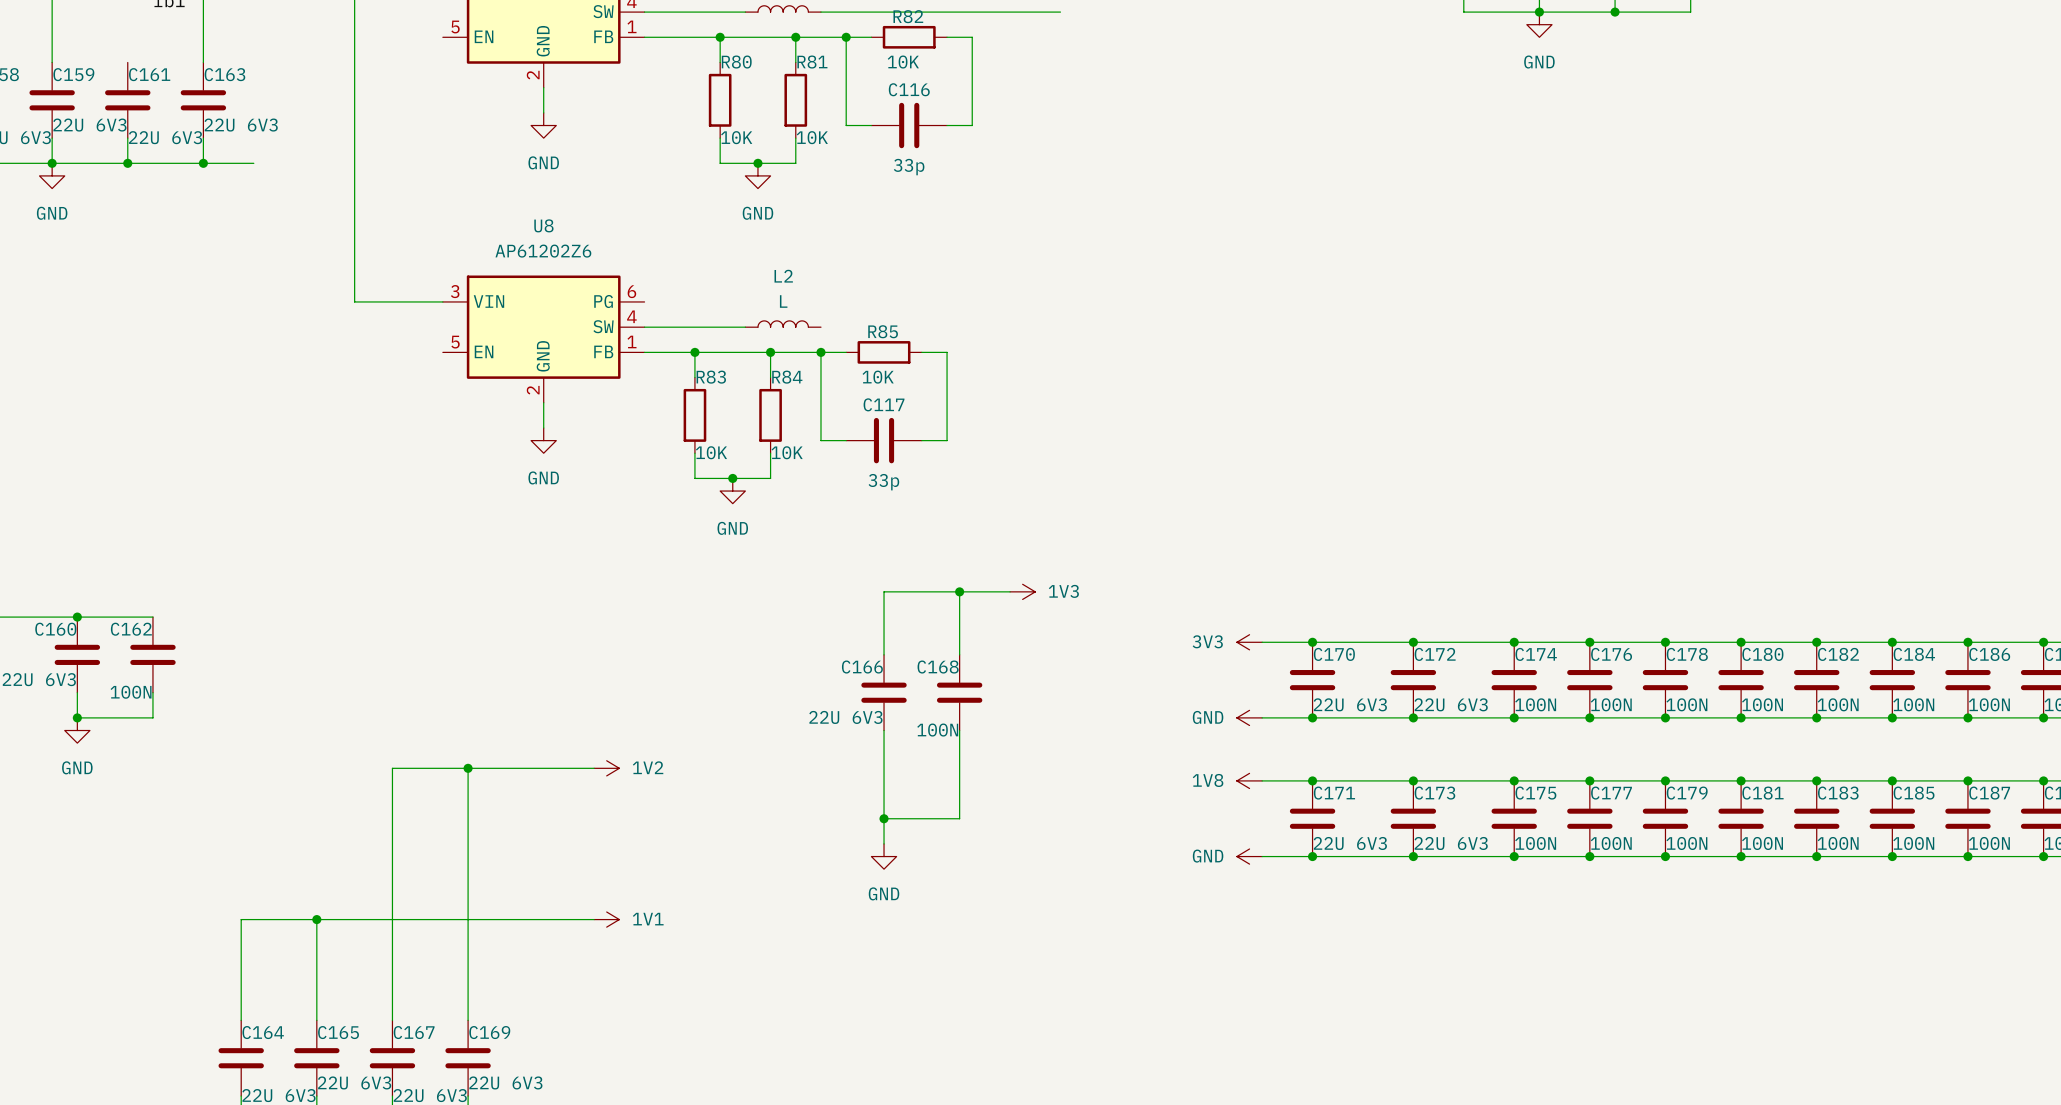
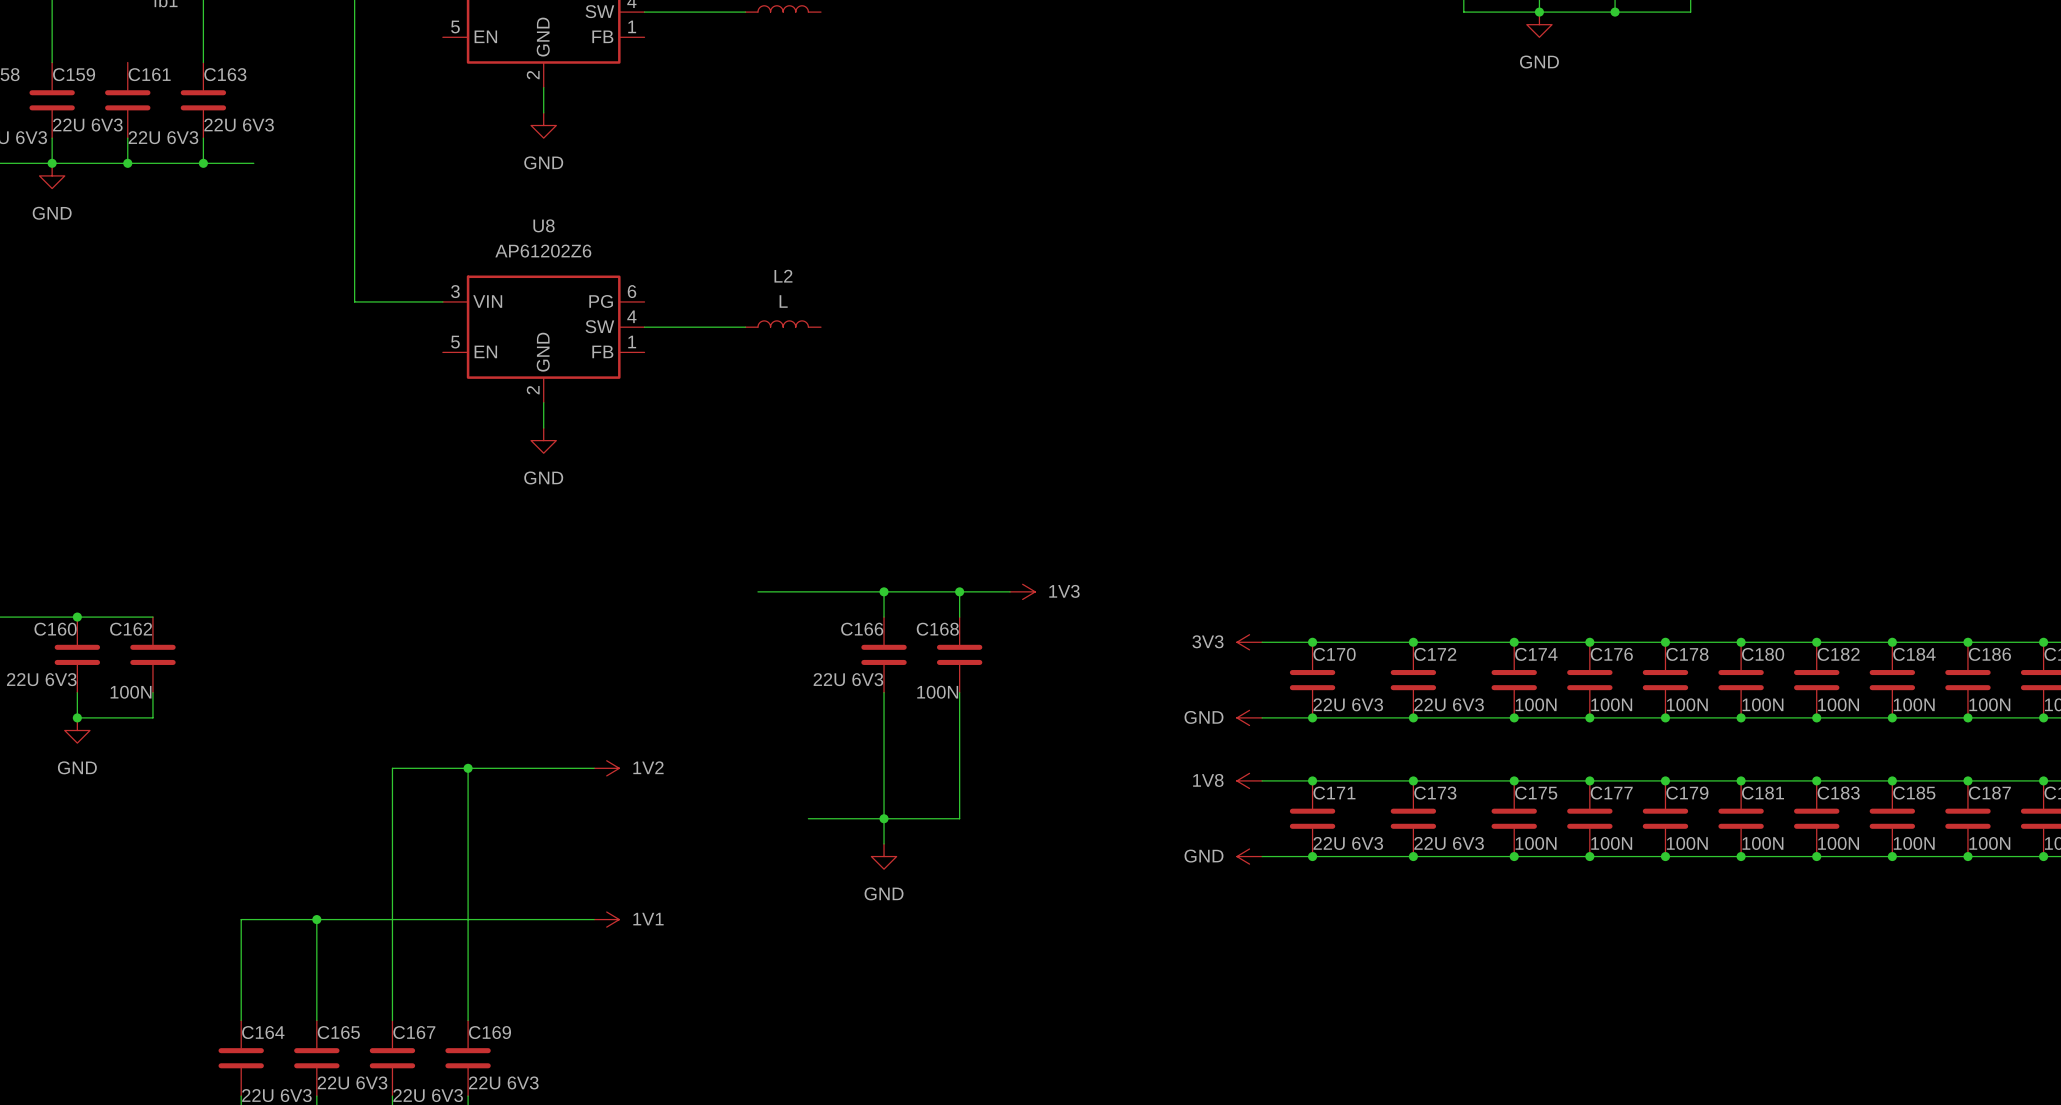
wire: (820, 12) (1060, 12) -> none
wire: (644, 37) (871, 37) -> none
wire: (720, 37) (720, 62) -> none
junction: (720, 37) -> none
wire: (795, 37) (795, 62) -> none
junction: (795, 37) -> none
wire: (846, 37) (846, 125) (871, 125) -> none
junction: (846, 37) -> none
R82: 10K (909, 37) -> none
wire: (947, 37) (972, 37) (972, 125) (947, 125) -> none
R80: 10K (720, 100) -> none
R81: 10K (795, 100) -> none
C116: 33p (909, 125) -> none
wire: (720, 138) (720, 163) (795, 163) (795, 138) -> none
junction: (757, 163) -> none
power symbol: GND (757, 175) -> none
wire: (644, 352) (846, 352) -> none
wire: (694, 352) (694, 377) -> none
junction: (694, 352) -> none
wire: (770, 352) (770, 377) -> none
junction: (770, 352) -> none
wire: (820, 352) (820, 440) (846, 440) -> none
junction: (820, 352) -> none
R85: 10K (884, 352) -> none
wire: (921, 352) (947, 352) (947, 440) (921, 440) -> none
R83: 10K (694, 415) -> none
R84: 10K (770, 415) -> none
C117: 33p (884, 440) -> none
wire: (694, 453) (694, 478) (770, 478) (770, 453) -> none
junction: (732, 478) -> none
power symbol: GND (732, 491) -> none
wire: none -> (757, 591) (884, 591)
junction: none -> (884, 591)
C166 position: (884, 692) -> (884, 654)
C168 position: (959, 692) -> (959, 654)
wire: none -> (808, 818) (884, 818)

